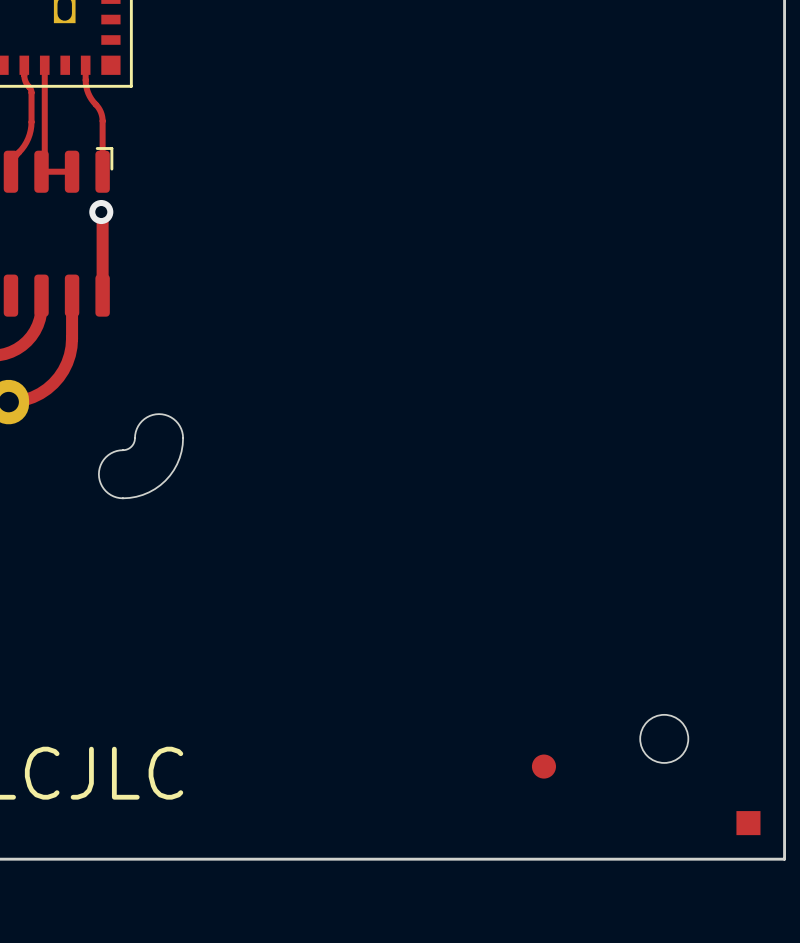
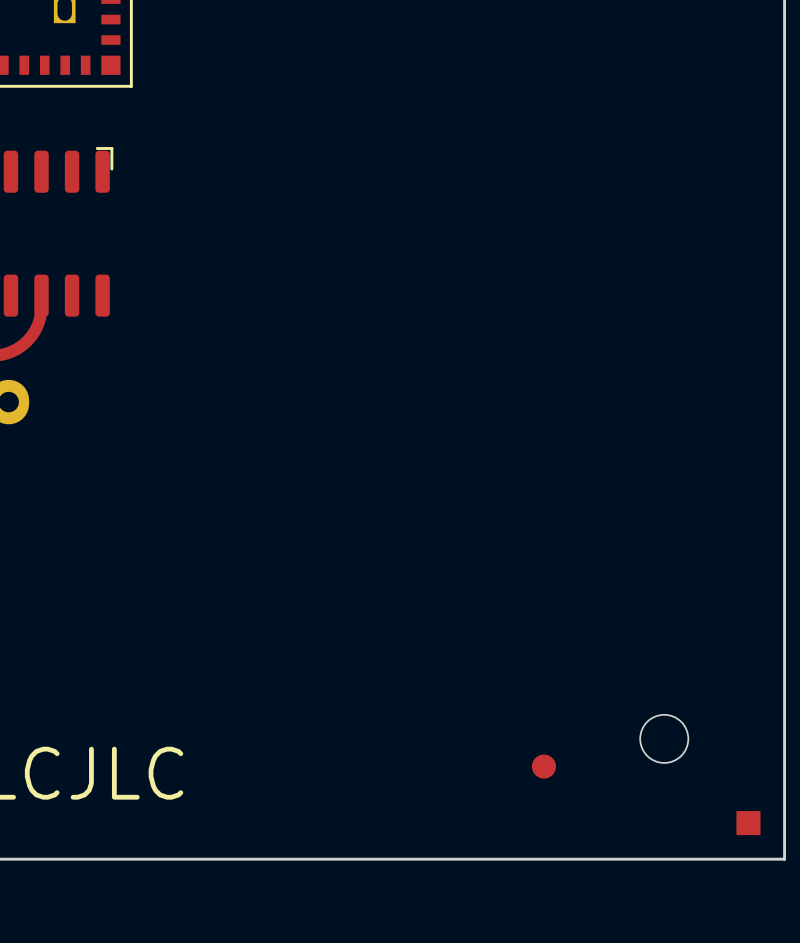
track: (24, 65) (25, 80) (31, 91) (31, 126) (26, 142) (13, 161) (10, 171) -> none
track: (44, 65) (44, 163) -> none
track: (85, 65) (87, 90) (102, 116) (102, 171) -> none
track: (41, 171) (72, 171) -> none
track: (101, 212) (102, 295) -> none
via: (101, 212) -> none
track: (72, 295) (71, 346) (63, 370) (53, 383) (40, 393) (25, 399) (8, 402) -> none
board edge: (134, 438) (133, 444) (128, 448) (108, 455) (99, 468) (99, 477) (102, 486) (108, 493) (116, 497) (136, 496) (154, 489) (169, 475) (179, 458) (182, 444) (182, 431) (178, 423) (168, 415) (155, 414) (144, 419) (136, 428) (134, 438) -> none

